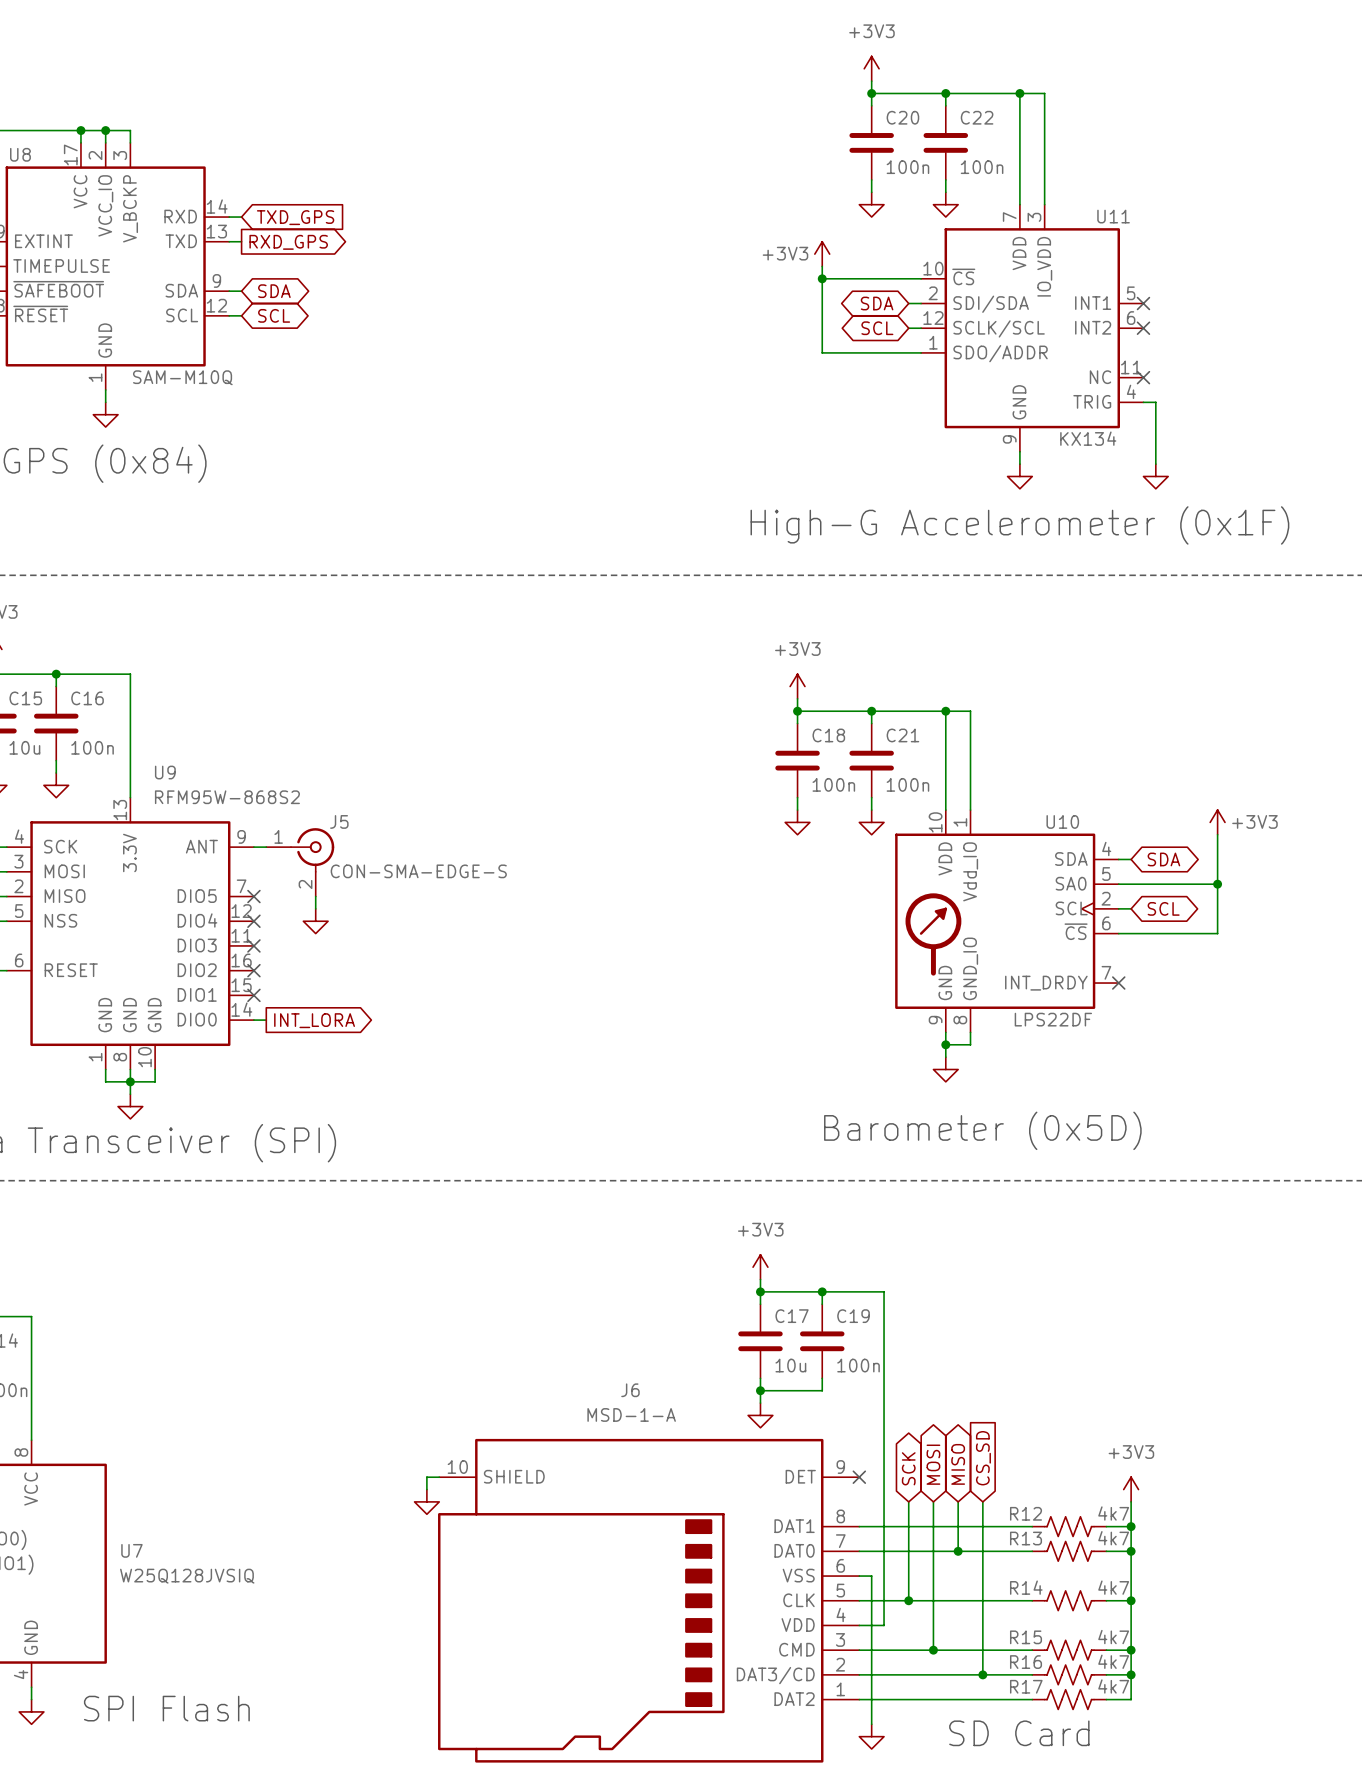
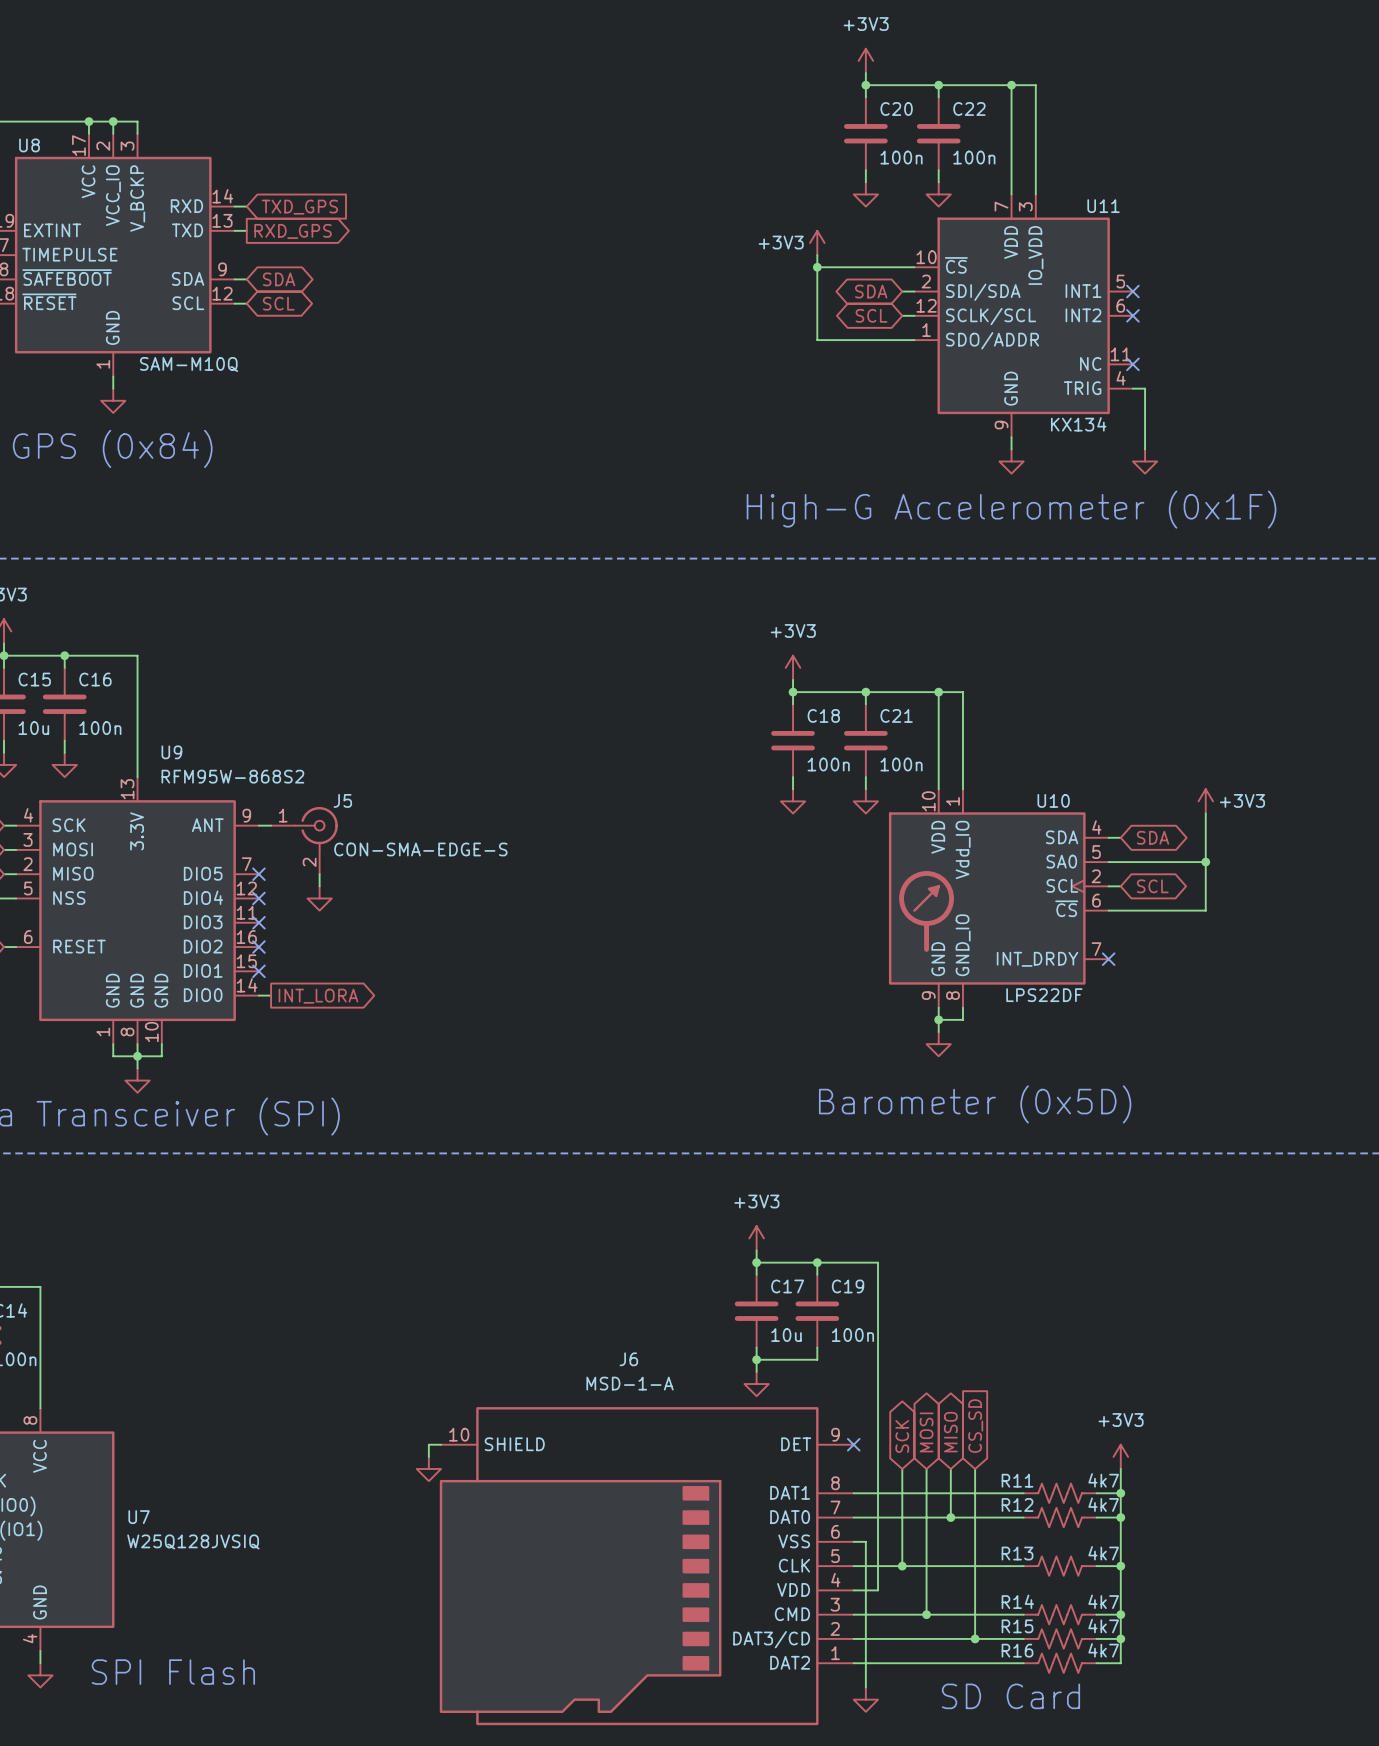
R12 name: R12 (1026, 1513) -> R11 (1017, 1480)
R13 name: R13 (1026, 1538) -> R12 (1017, 1504)
R14 name: R14 (1026, 1587) -> R13 (1017, 1553)
R15 name: R15 (1026, 1637) -> R14 (1017, 1601)
R16 name: R16 (1026, 1662) -> R15 (1017, 1626)
R17 name: R17 (1026, 1686) -> R16 (1017, 1650)

